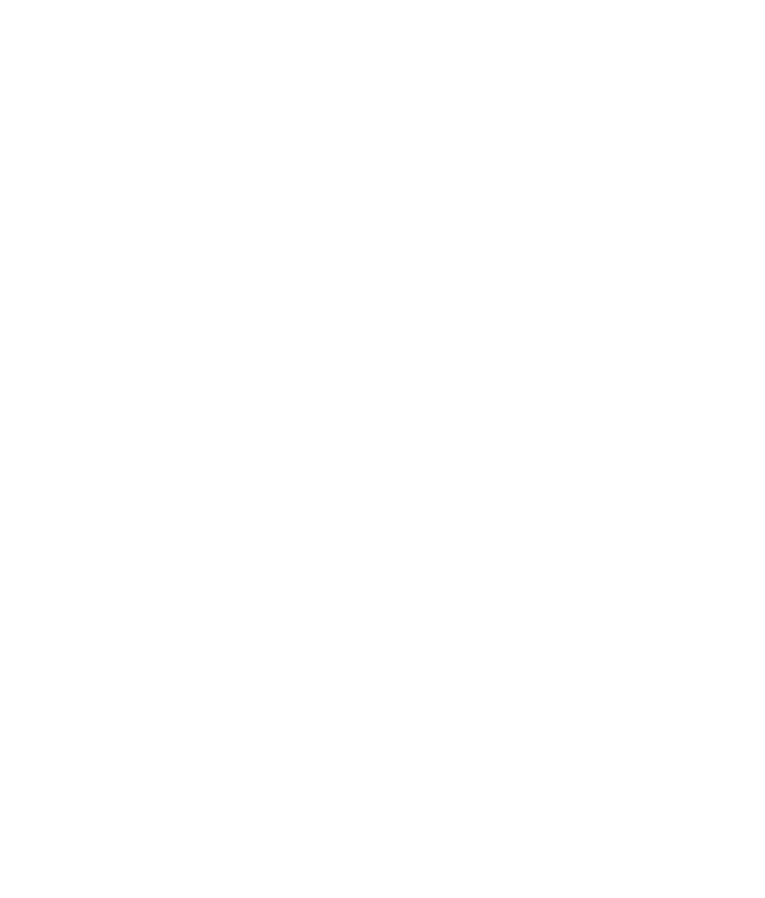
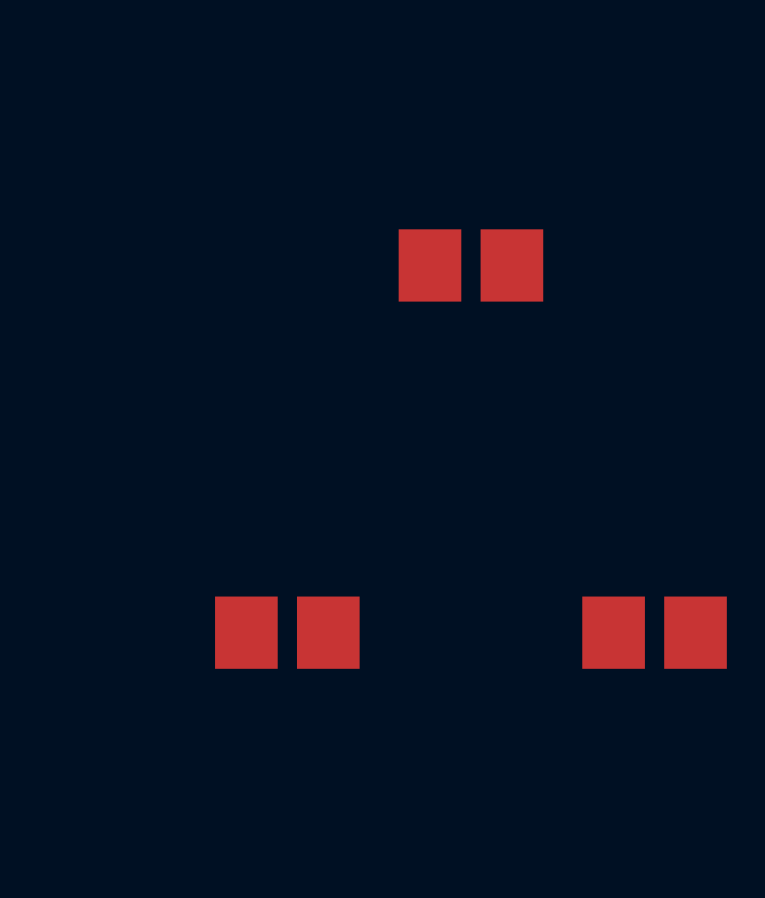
part: none -> (470, 265)
part: none -> (287, 632)
part: none -> (654, 632)

